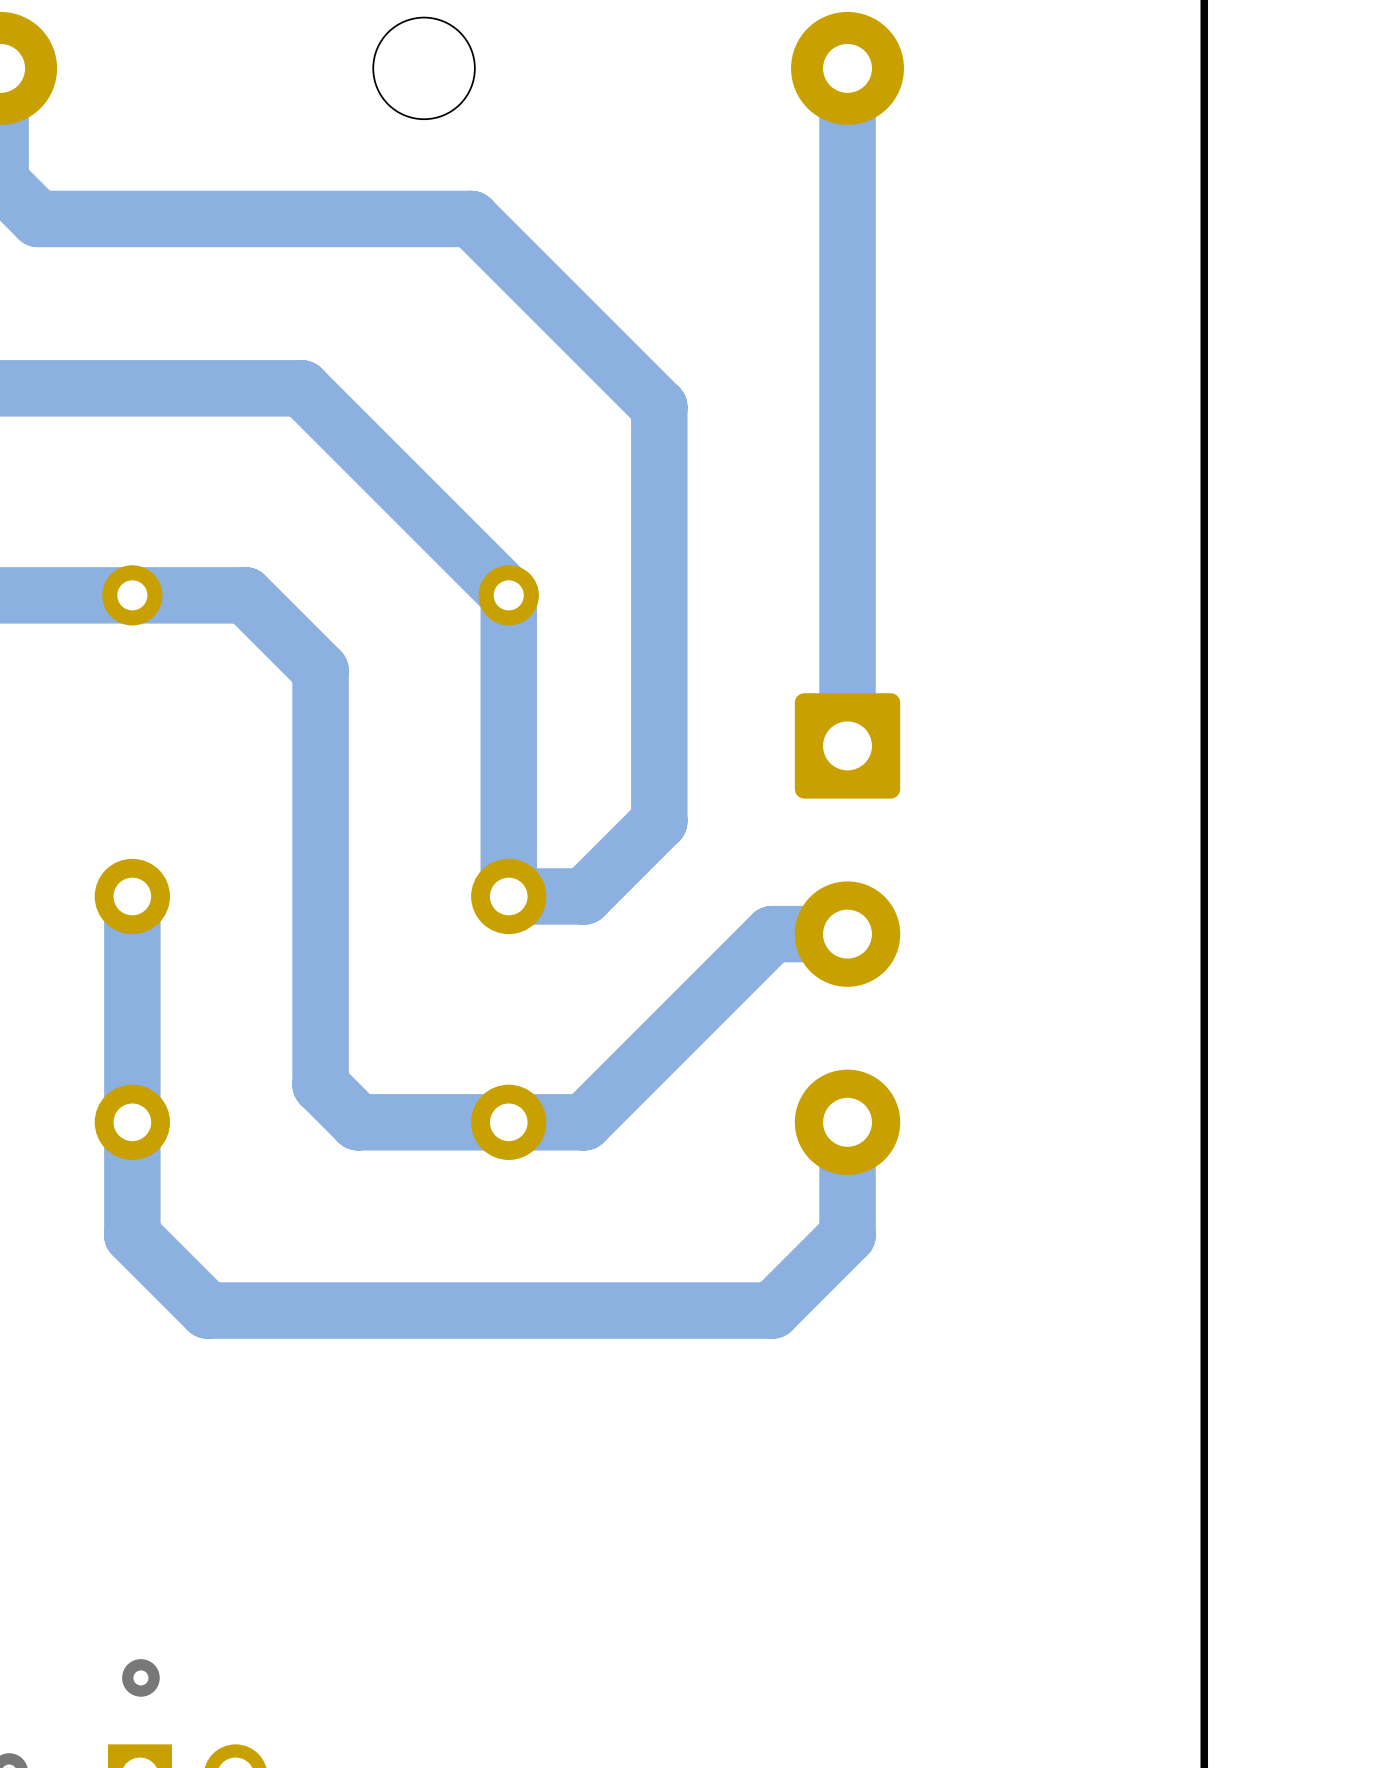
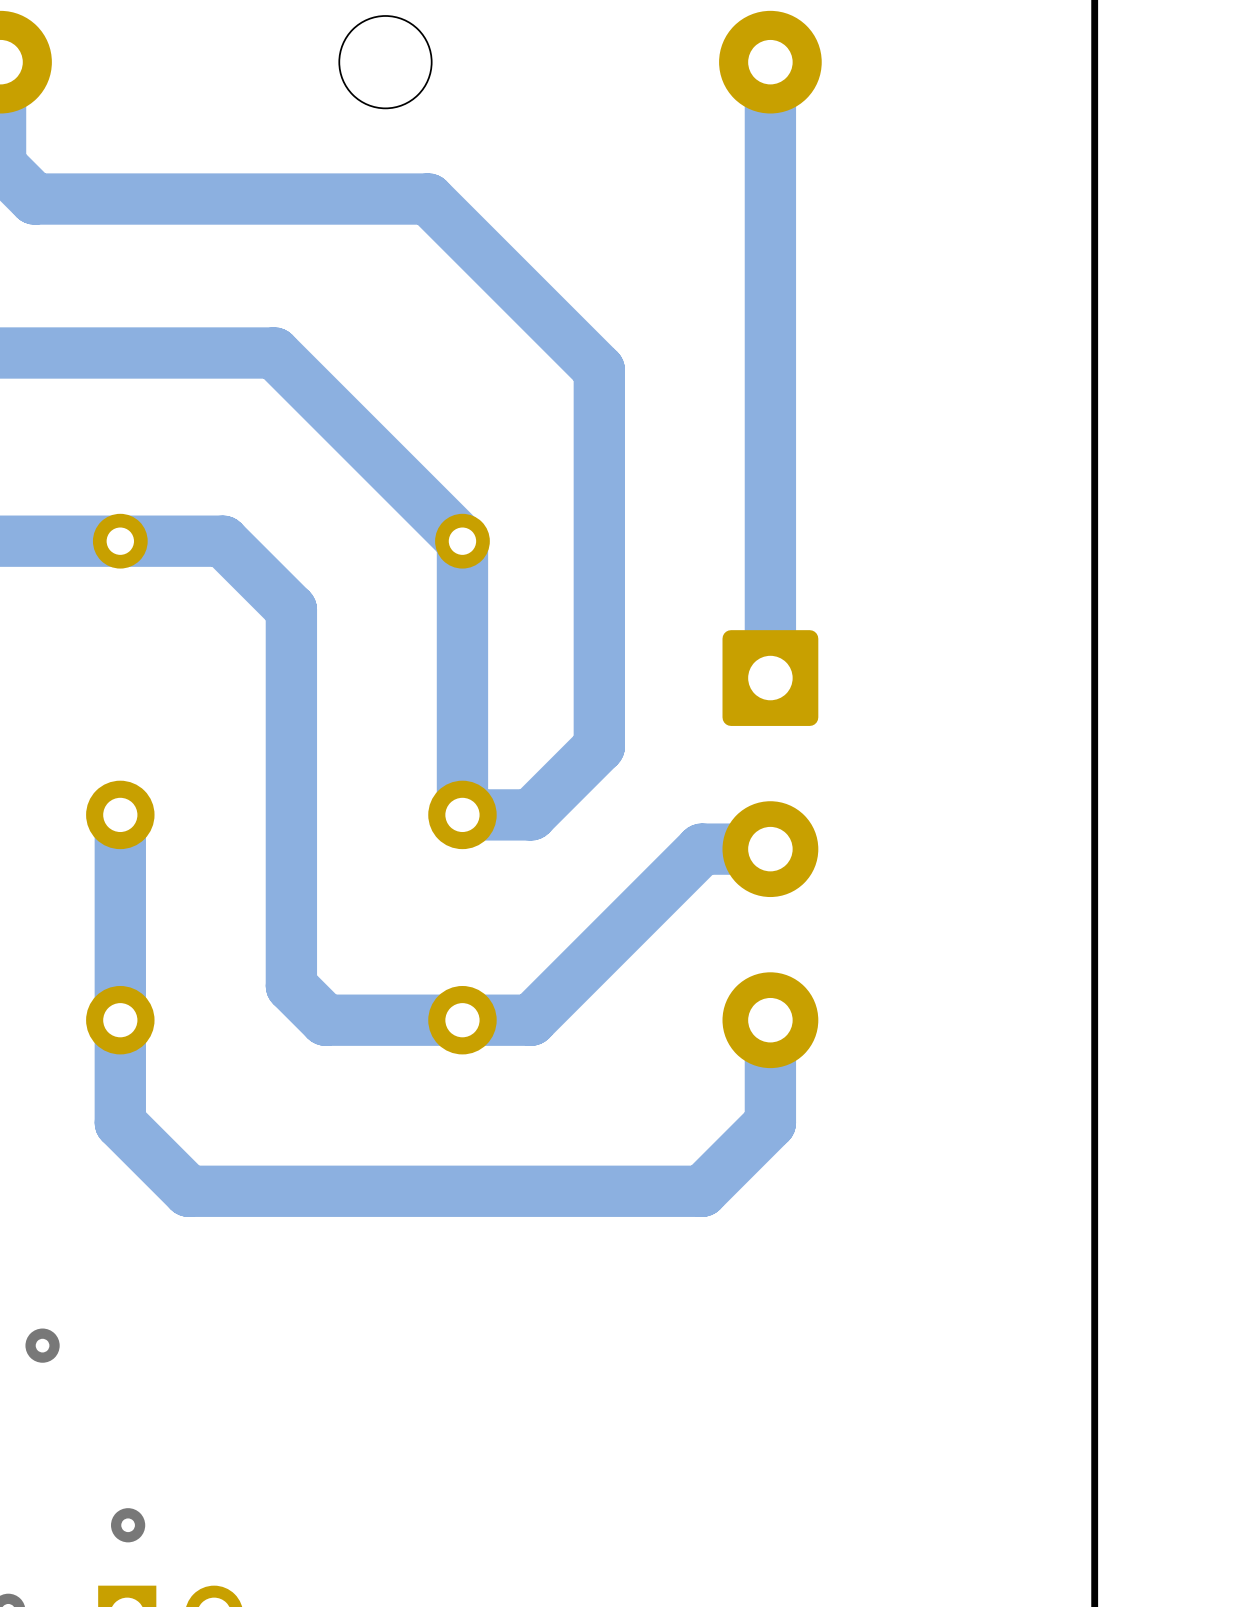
via: none -> (42, 1345)

